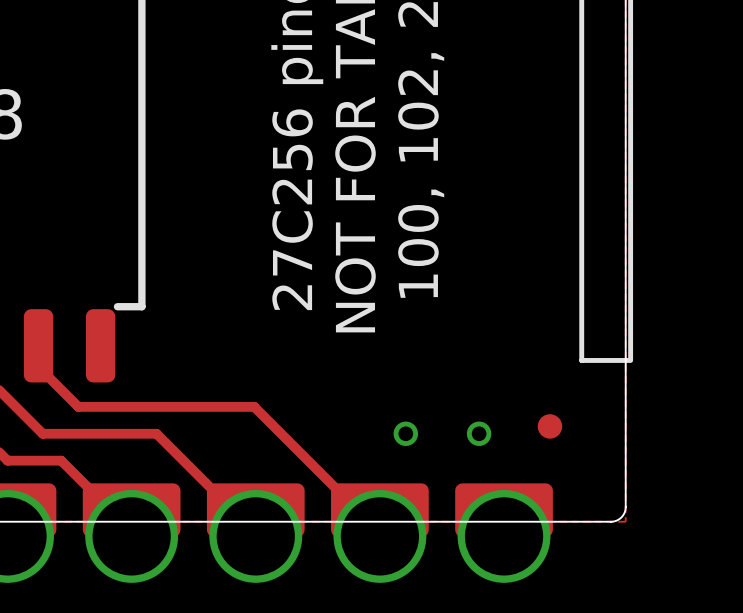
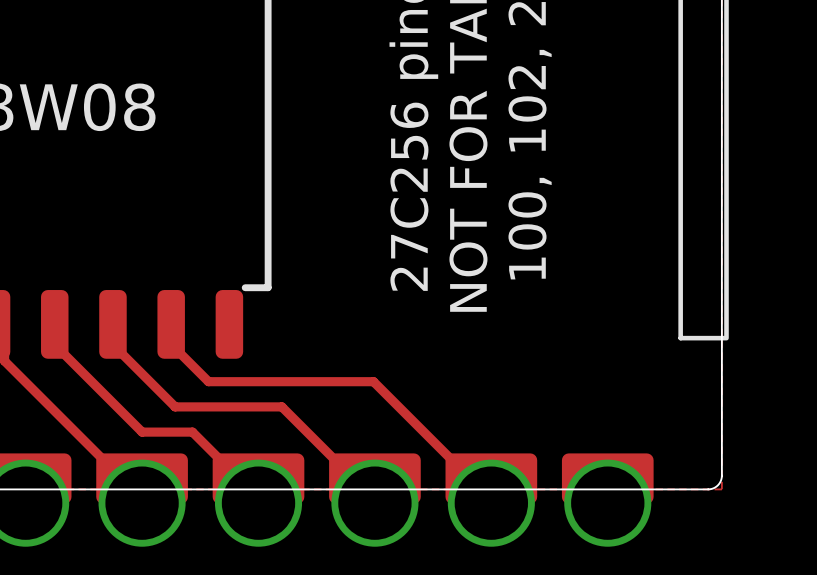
part: (549, 426) -> none
via: (405, 433) -> none
via: (479, 433) -> none

